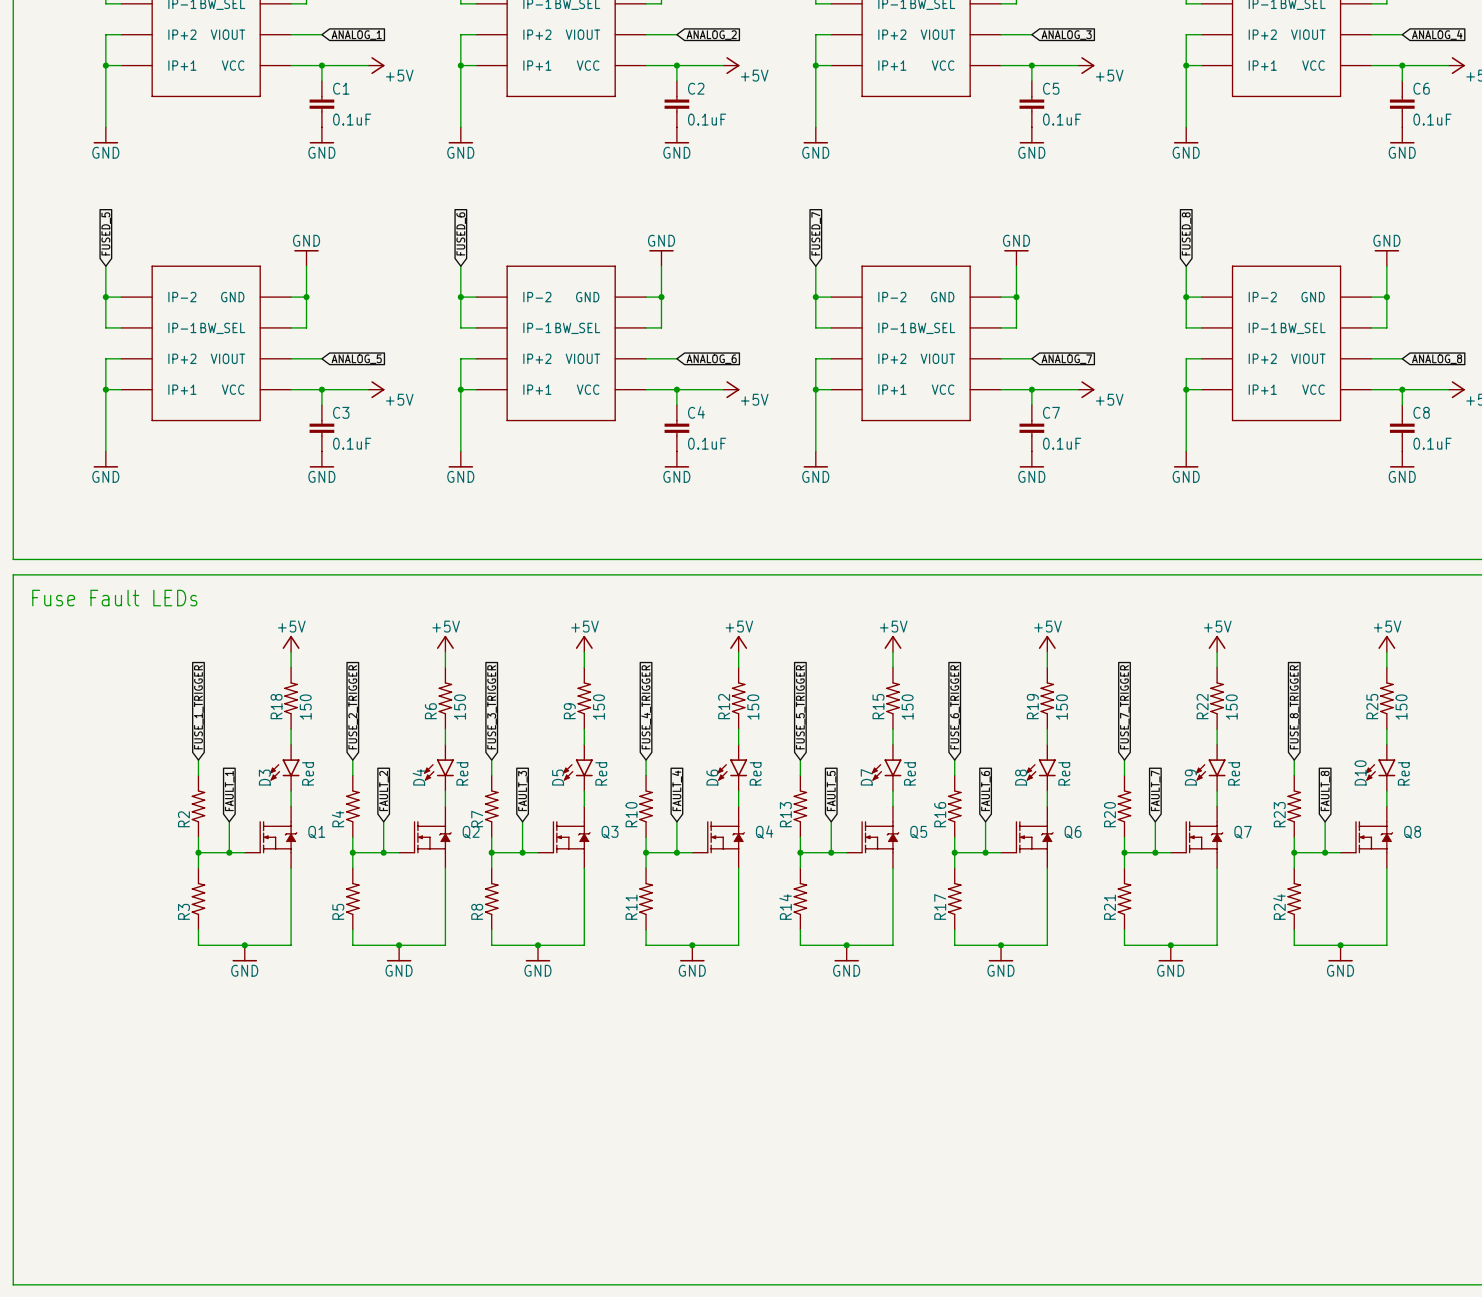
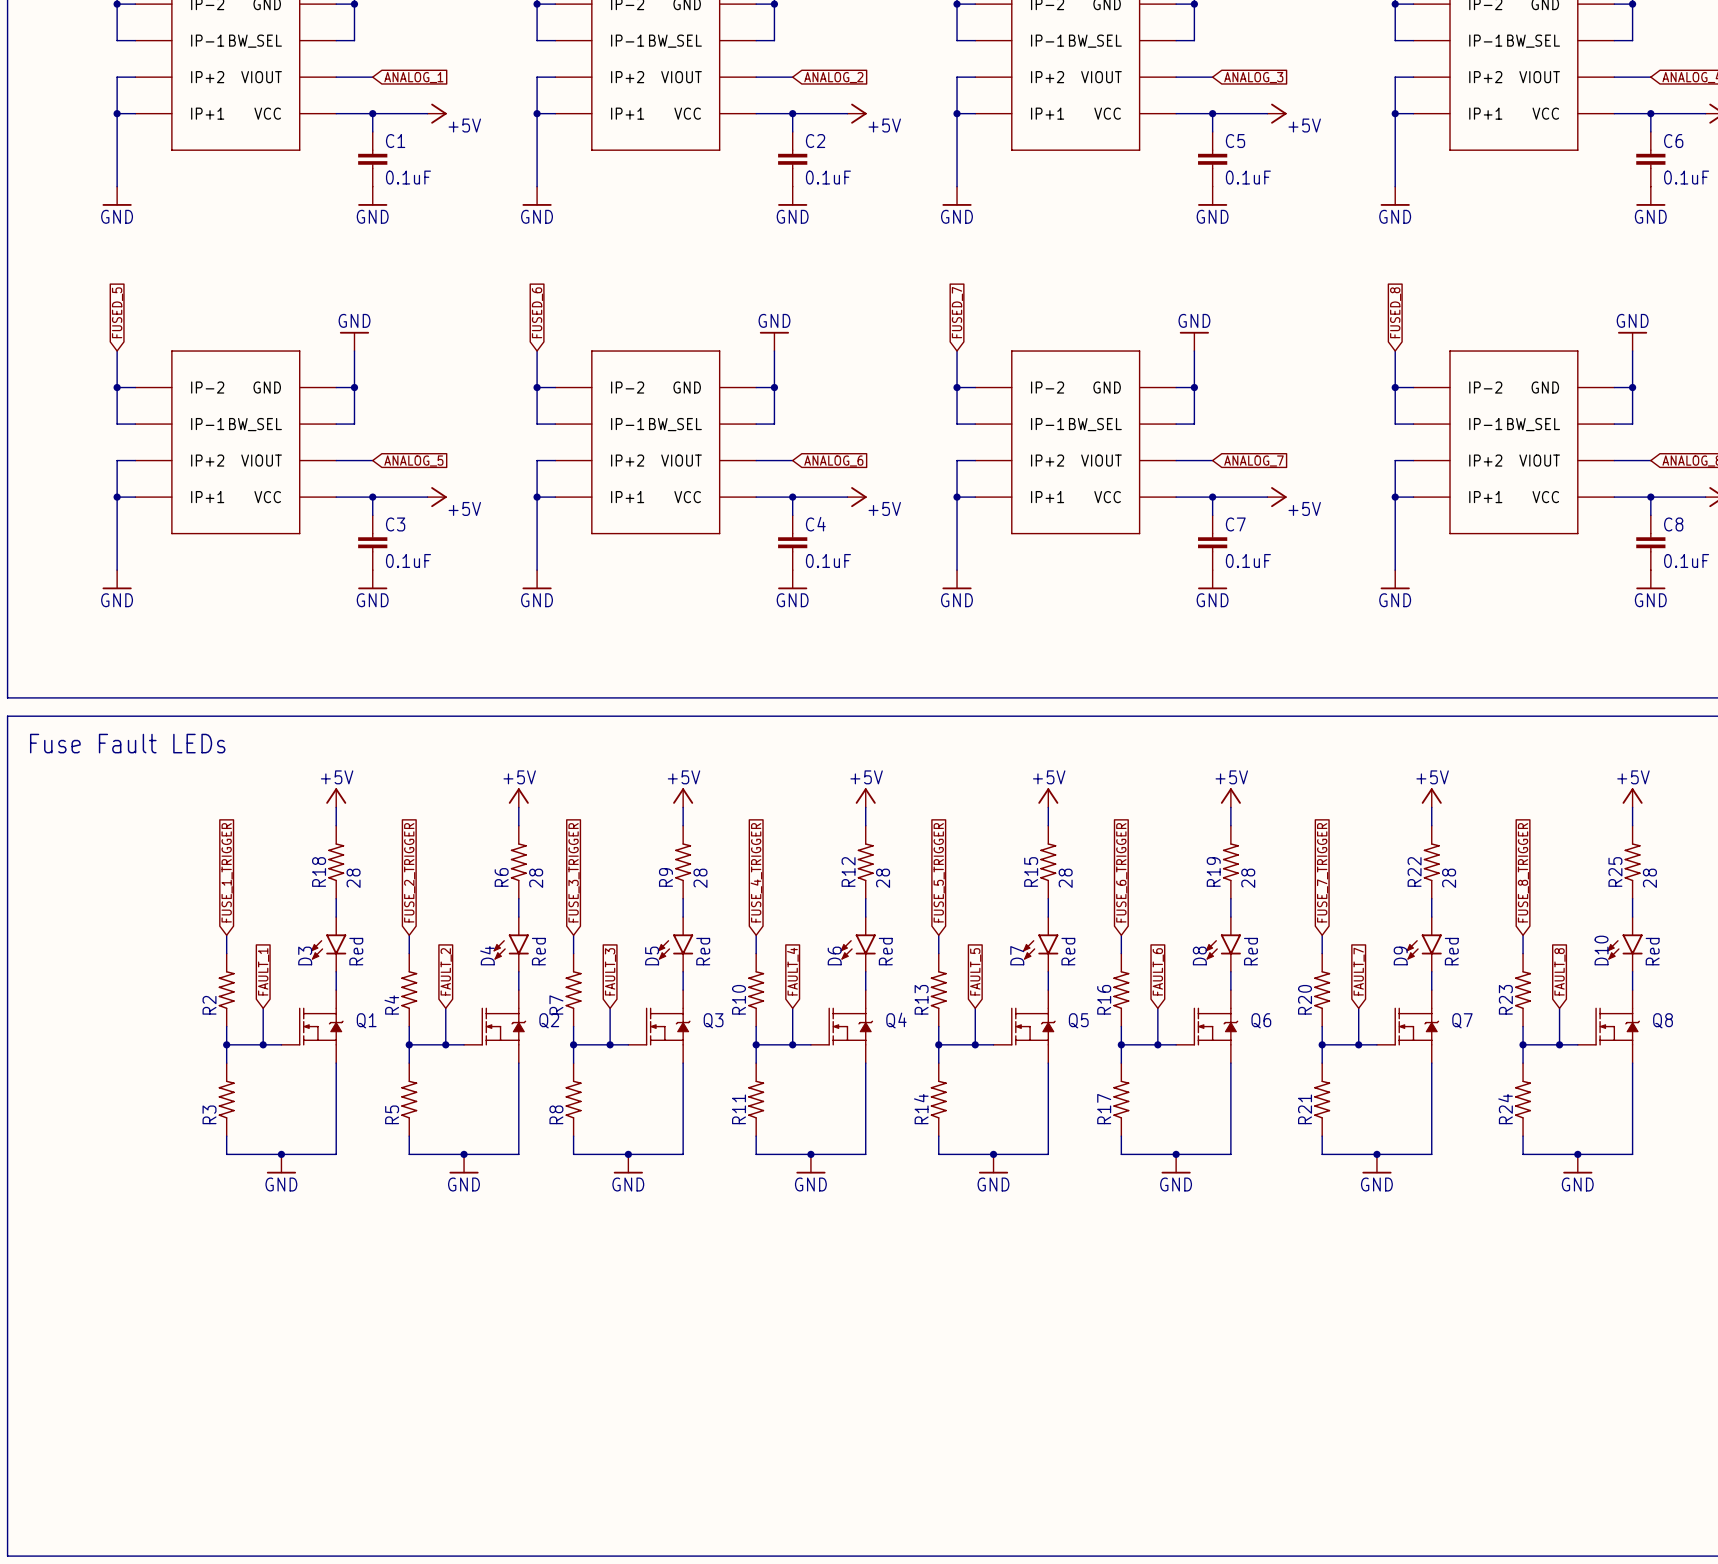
R18 value: 150 (305, 707) -> 28 (353, 878)
R6 value: 150 (460, 707) -> 28 (536, 878)
R9 value: 150 (598, 707) -> 28 (700, 878)
R12 value: 150 (753, 707) -> 28 (883, 878)
R15 value: 150 (907, 707) -> 28 (1065, 878)
R19 value: 150 (1061, 707) -> 28 (1248, 878)
R22 value: 150 (1231, 707) -> 28 (1449, 878)
R25 value: 150 (1401, 707) -> 28 (1649, 878)

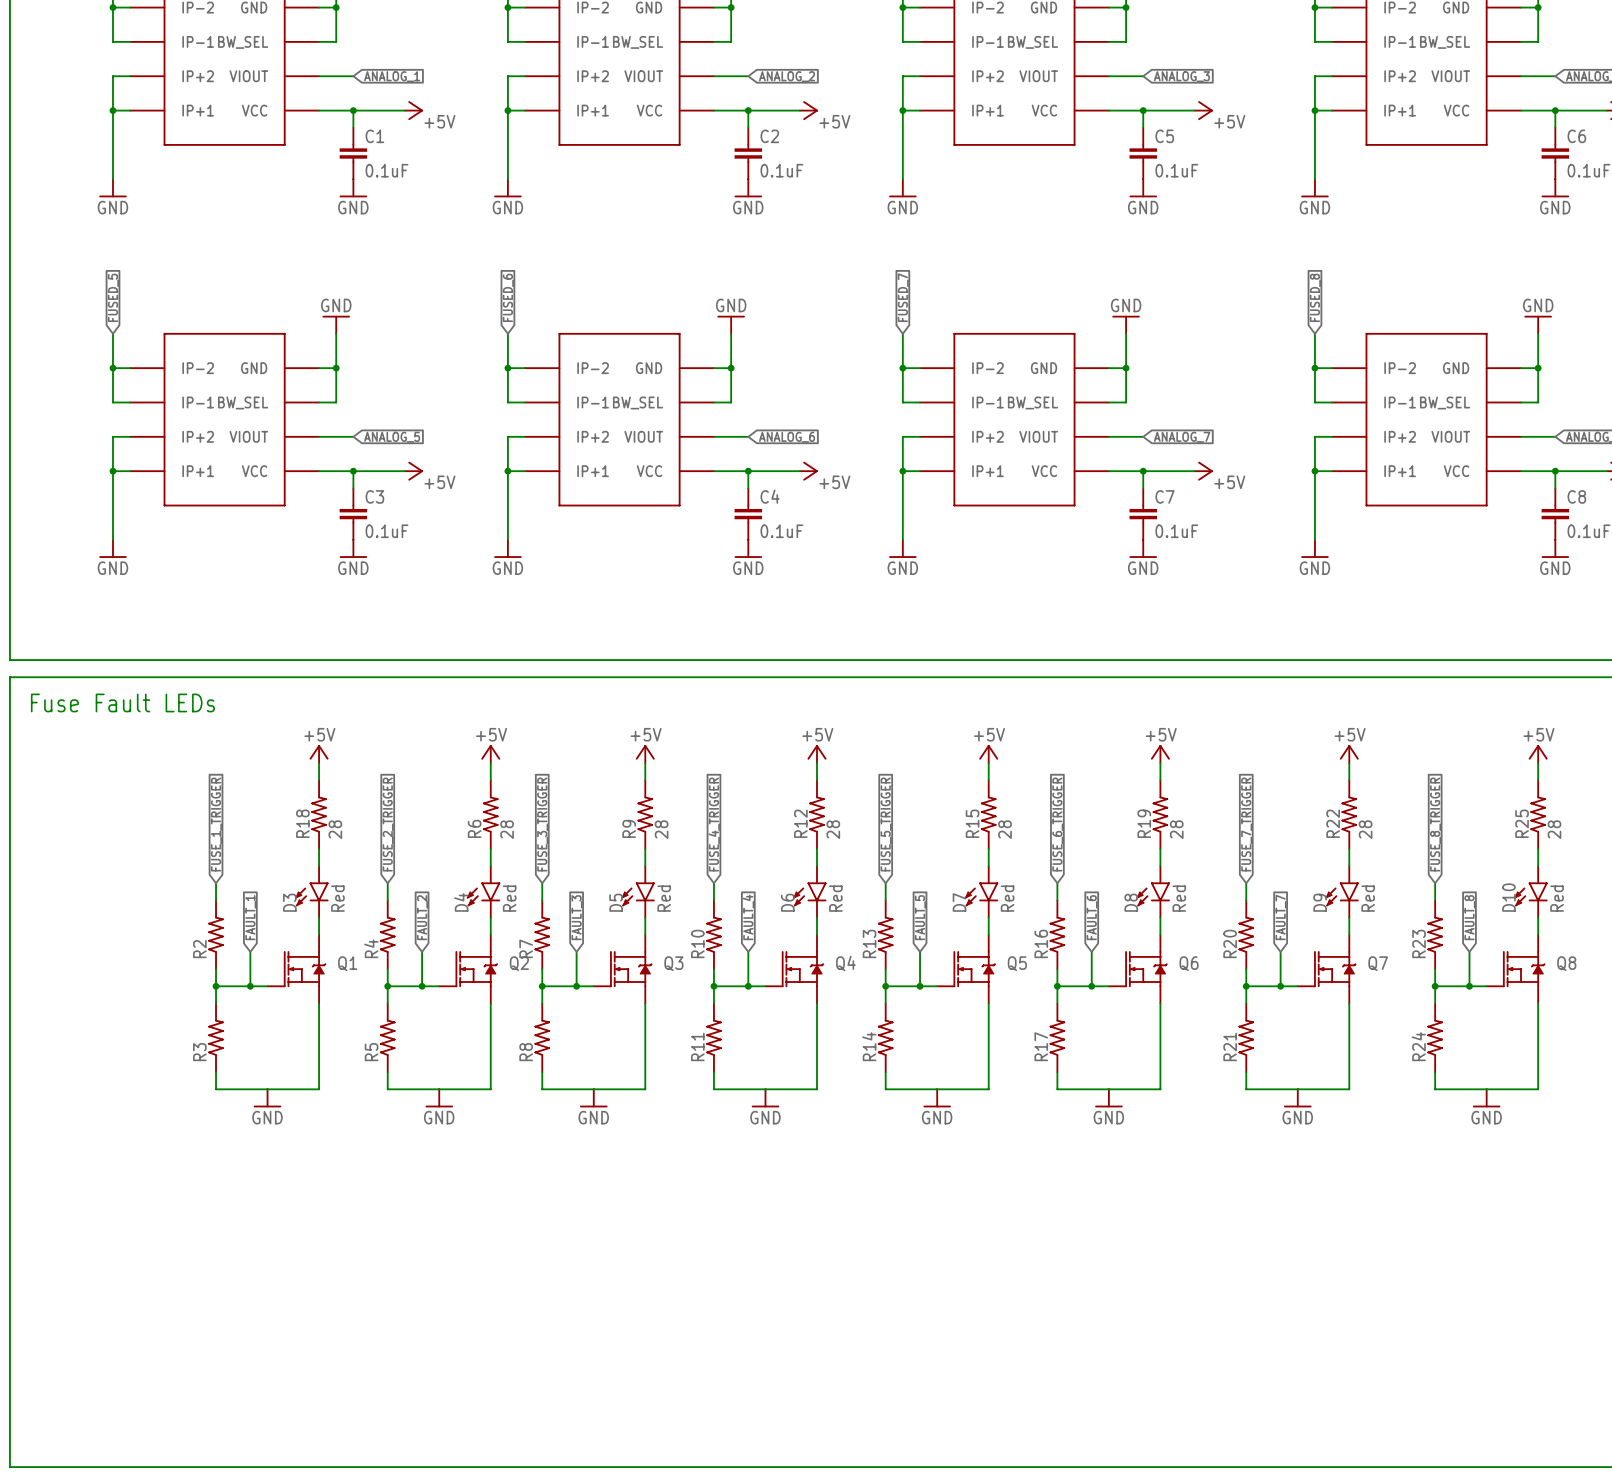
junction: (281, 1154) -> none
junction: (464, 1154) -> none
junction: (628, 1154) -> none
junction: (810, 1154) -> none
junction: (993, 1154) -> none
junction: (1176, 1154) -> none
junction: (1376, 1154) -> none
junction: (1577, 1154) -> none

